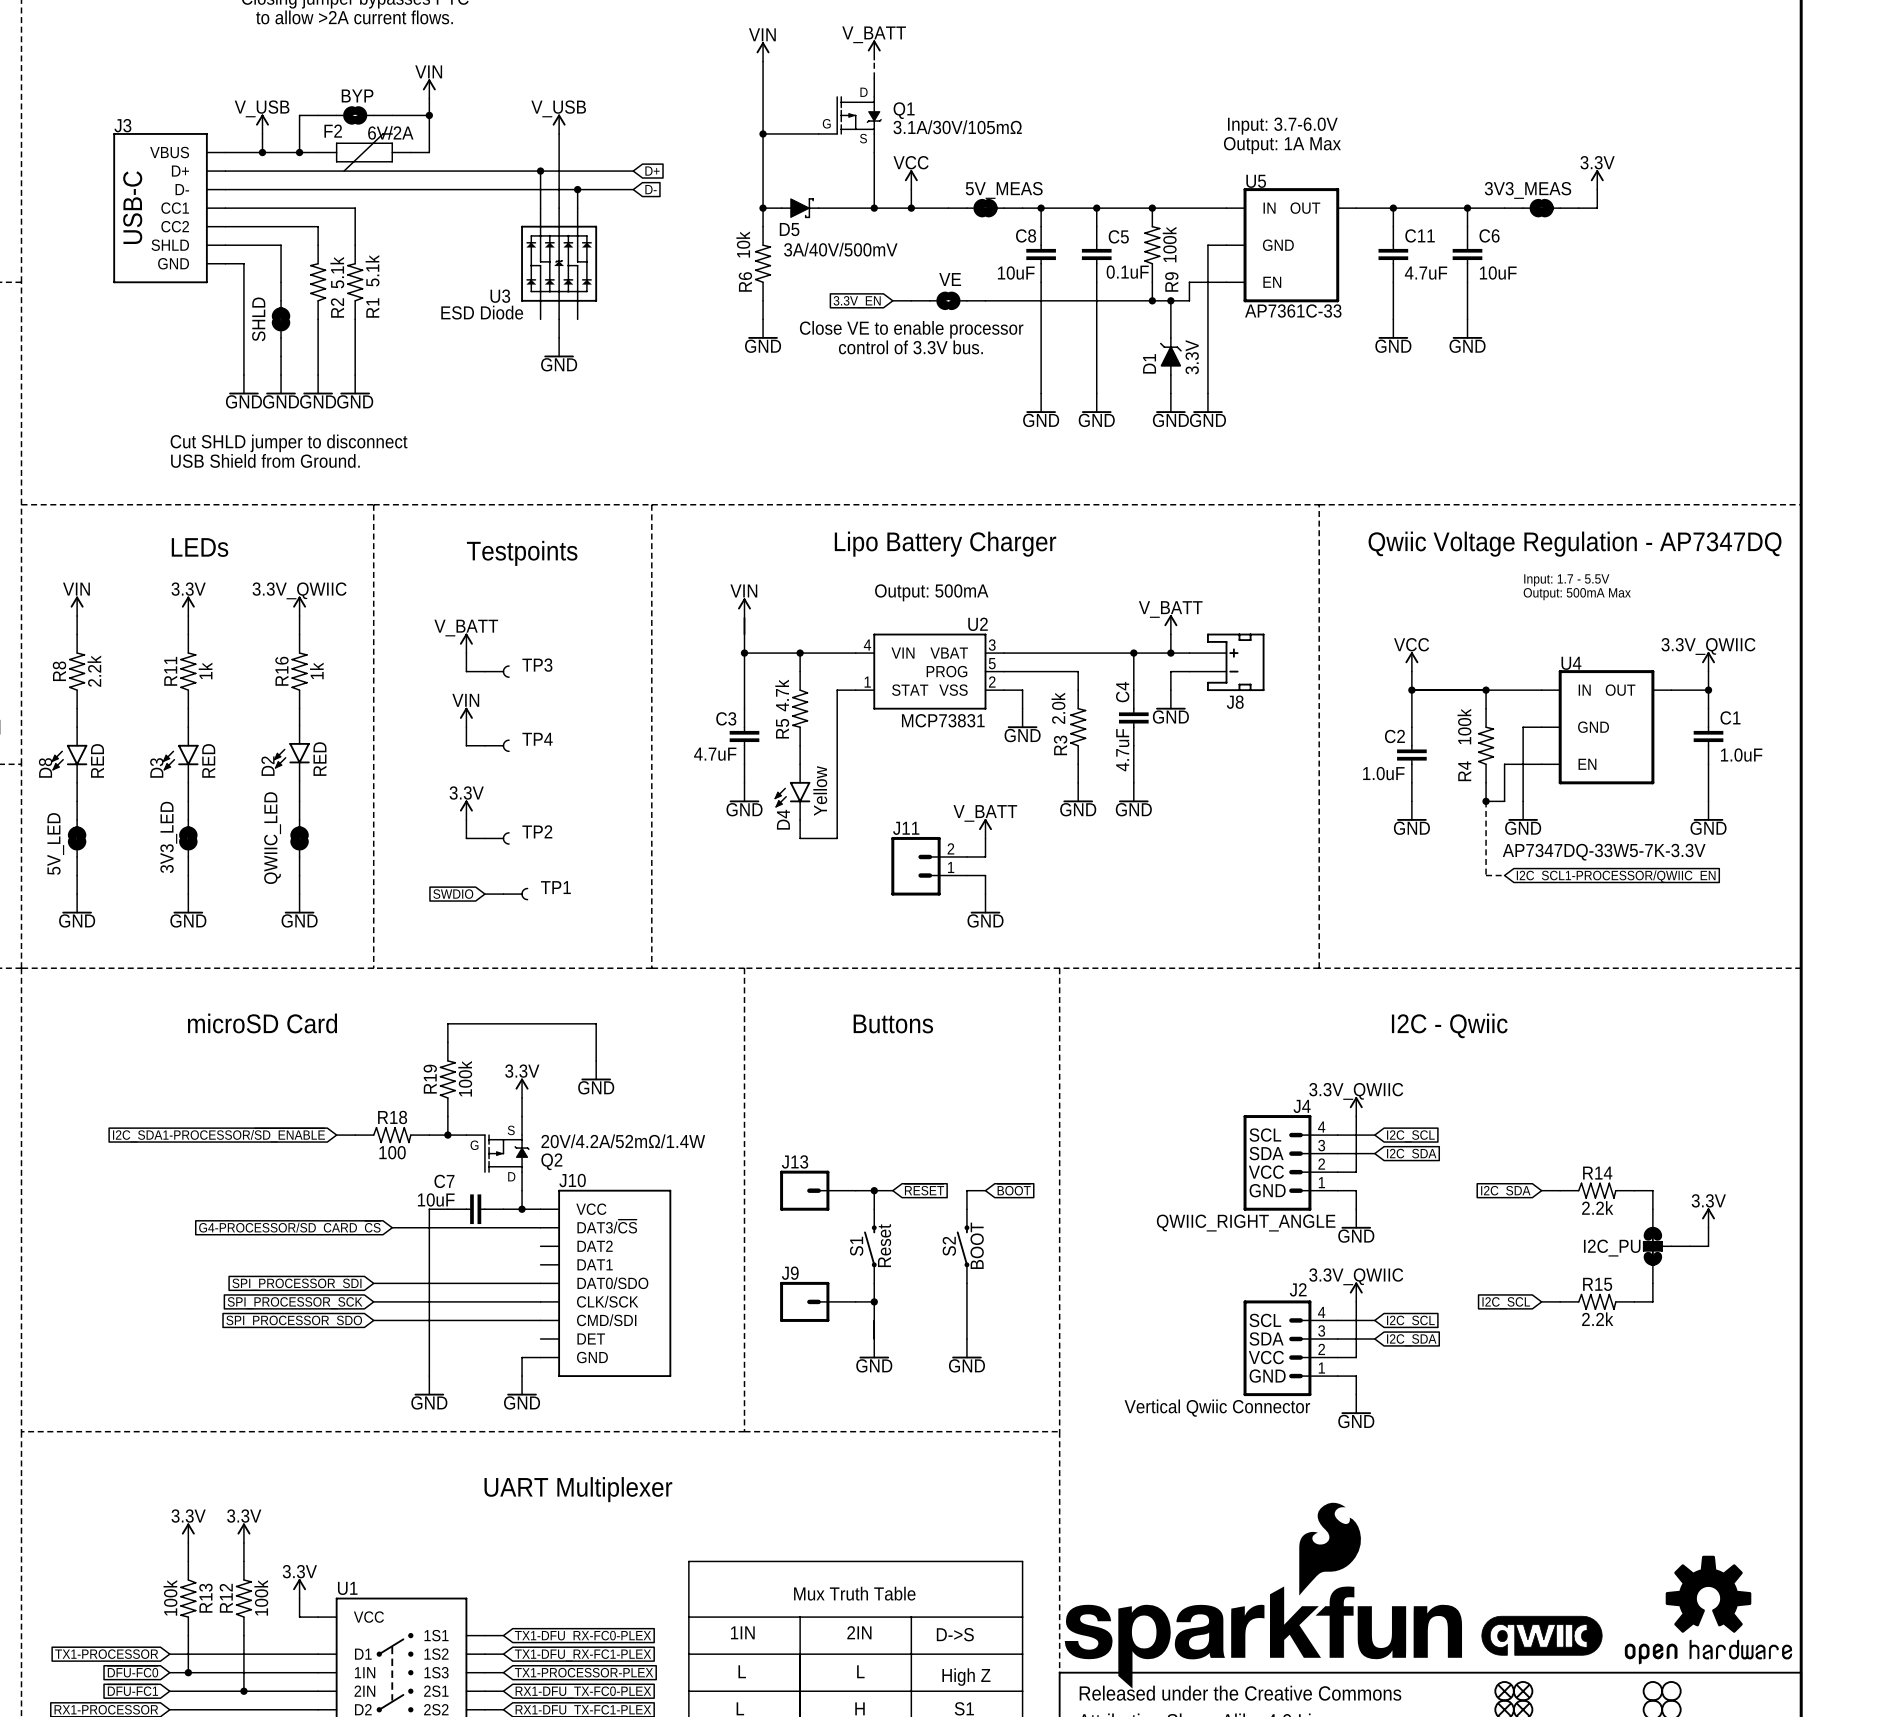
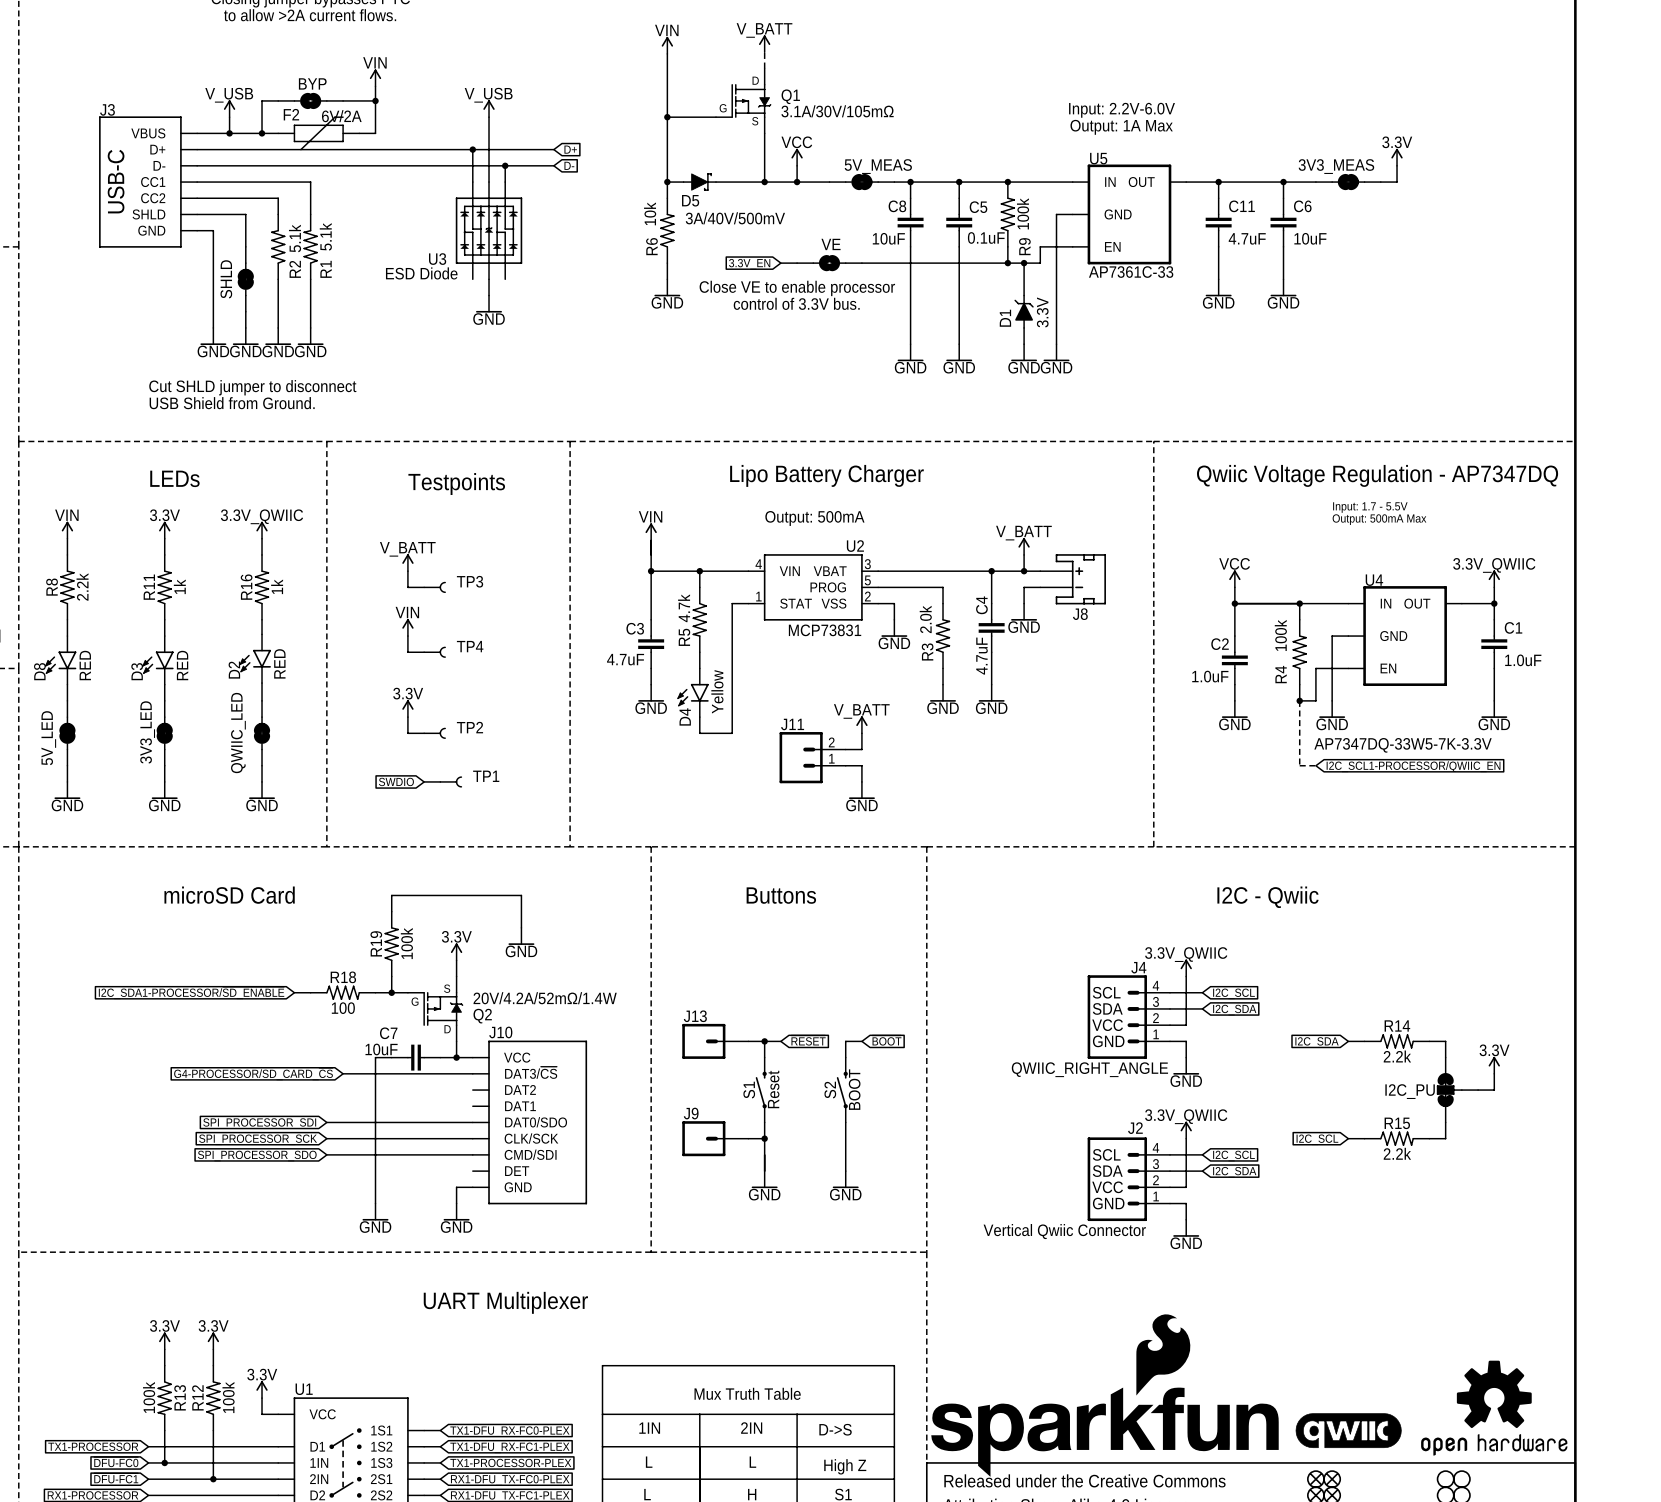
text: Input: 3.7-6.0V (1282, 126) -> Input: 2.2V-6.0V (1122, 110)

